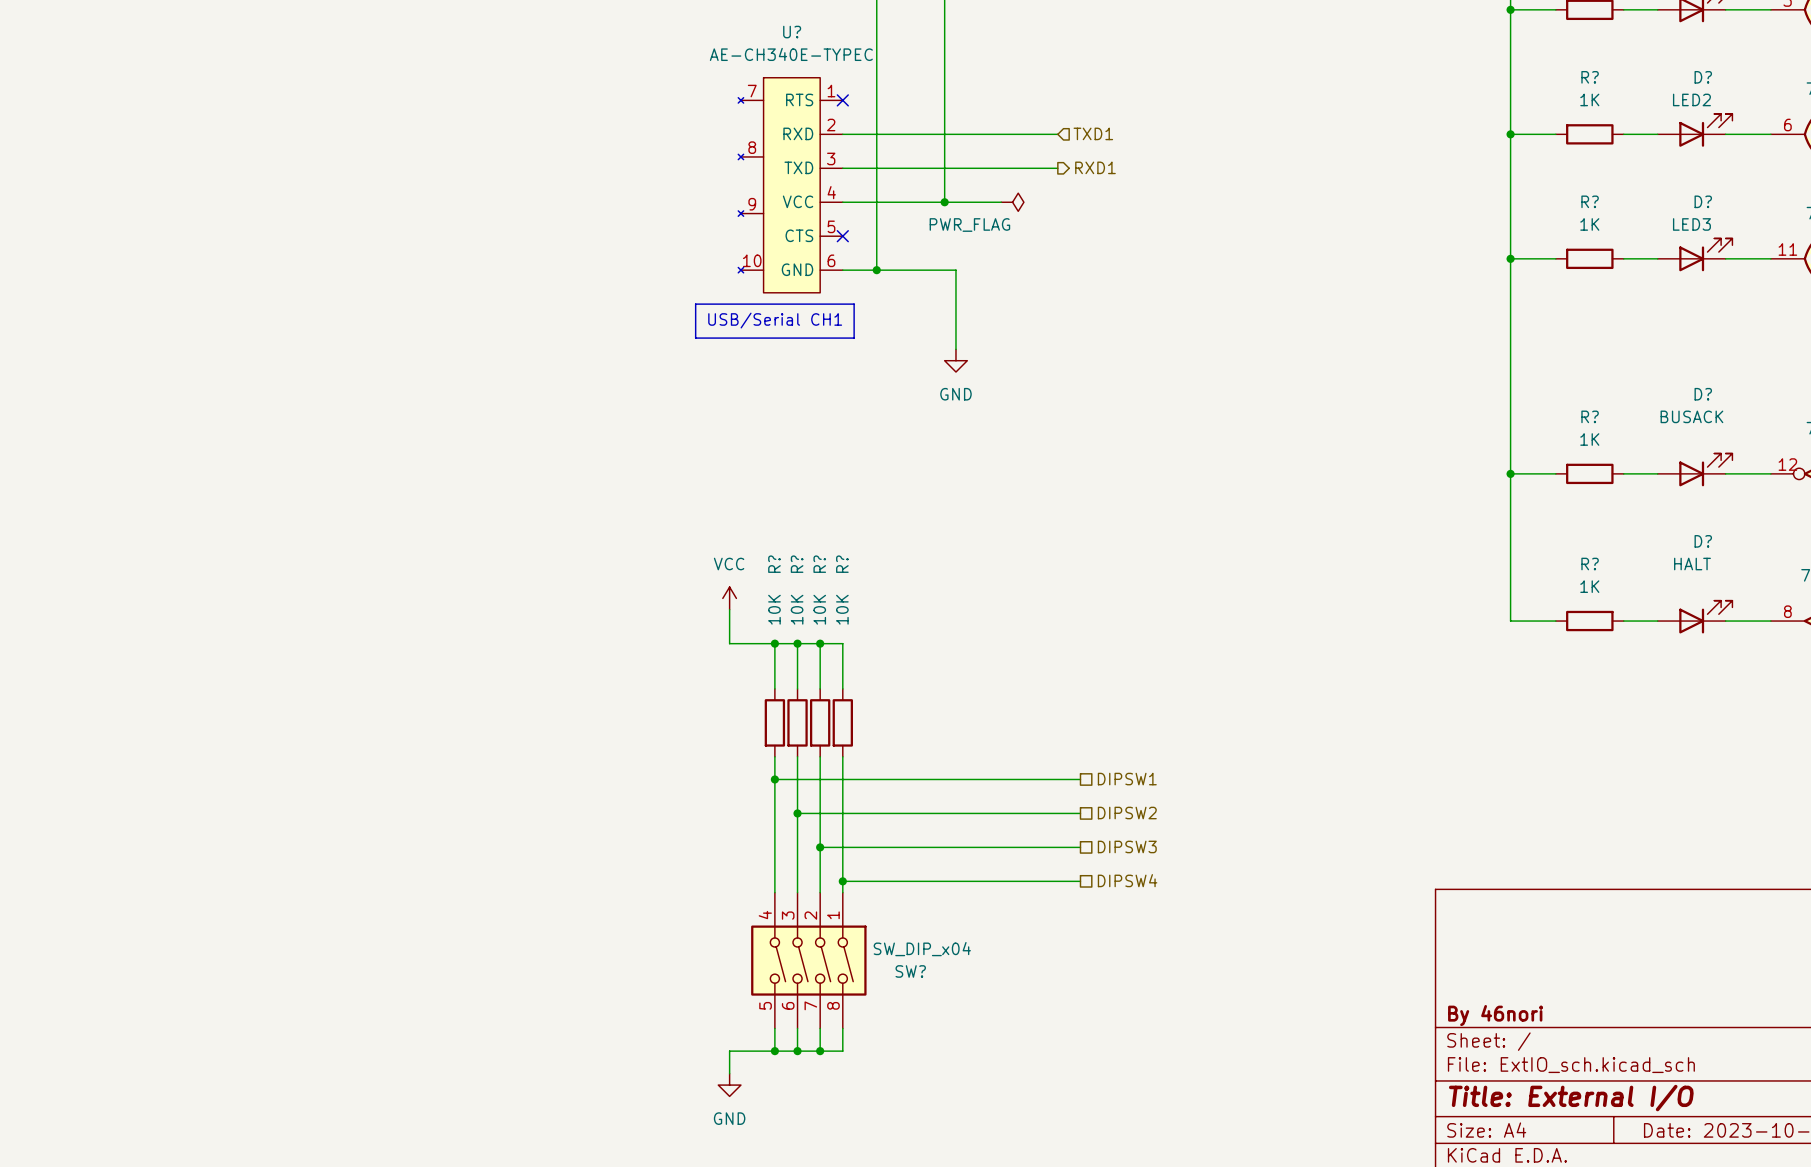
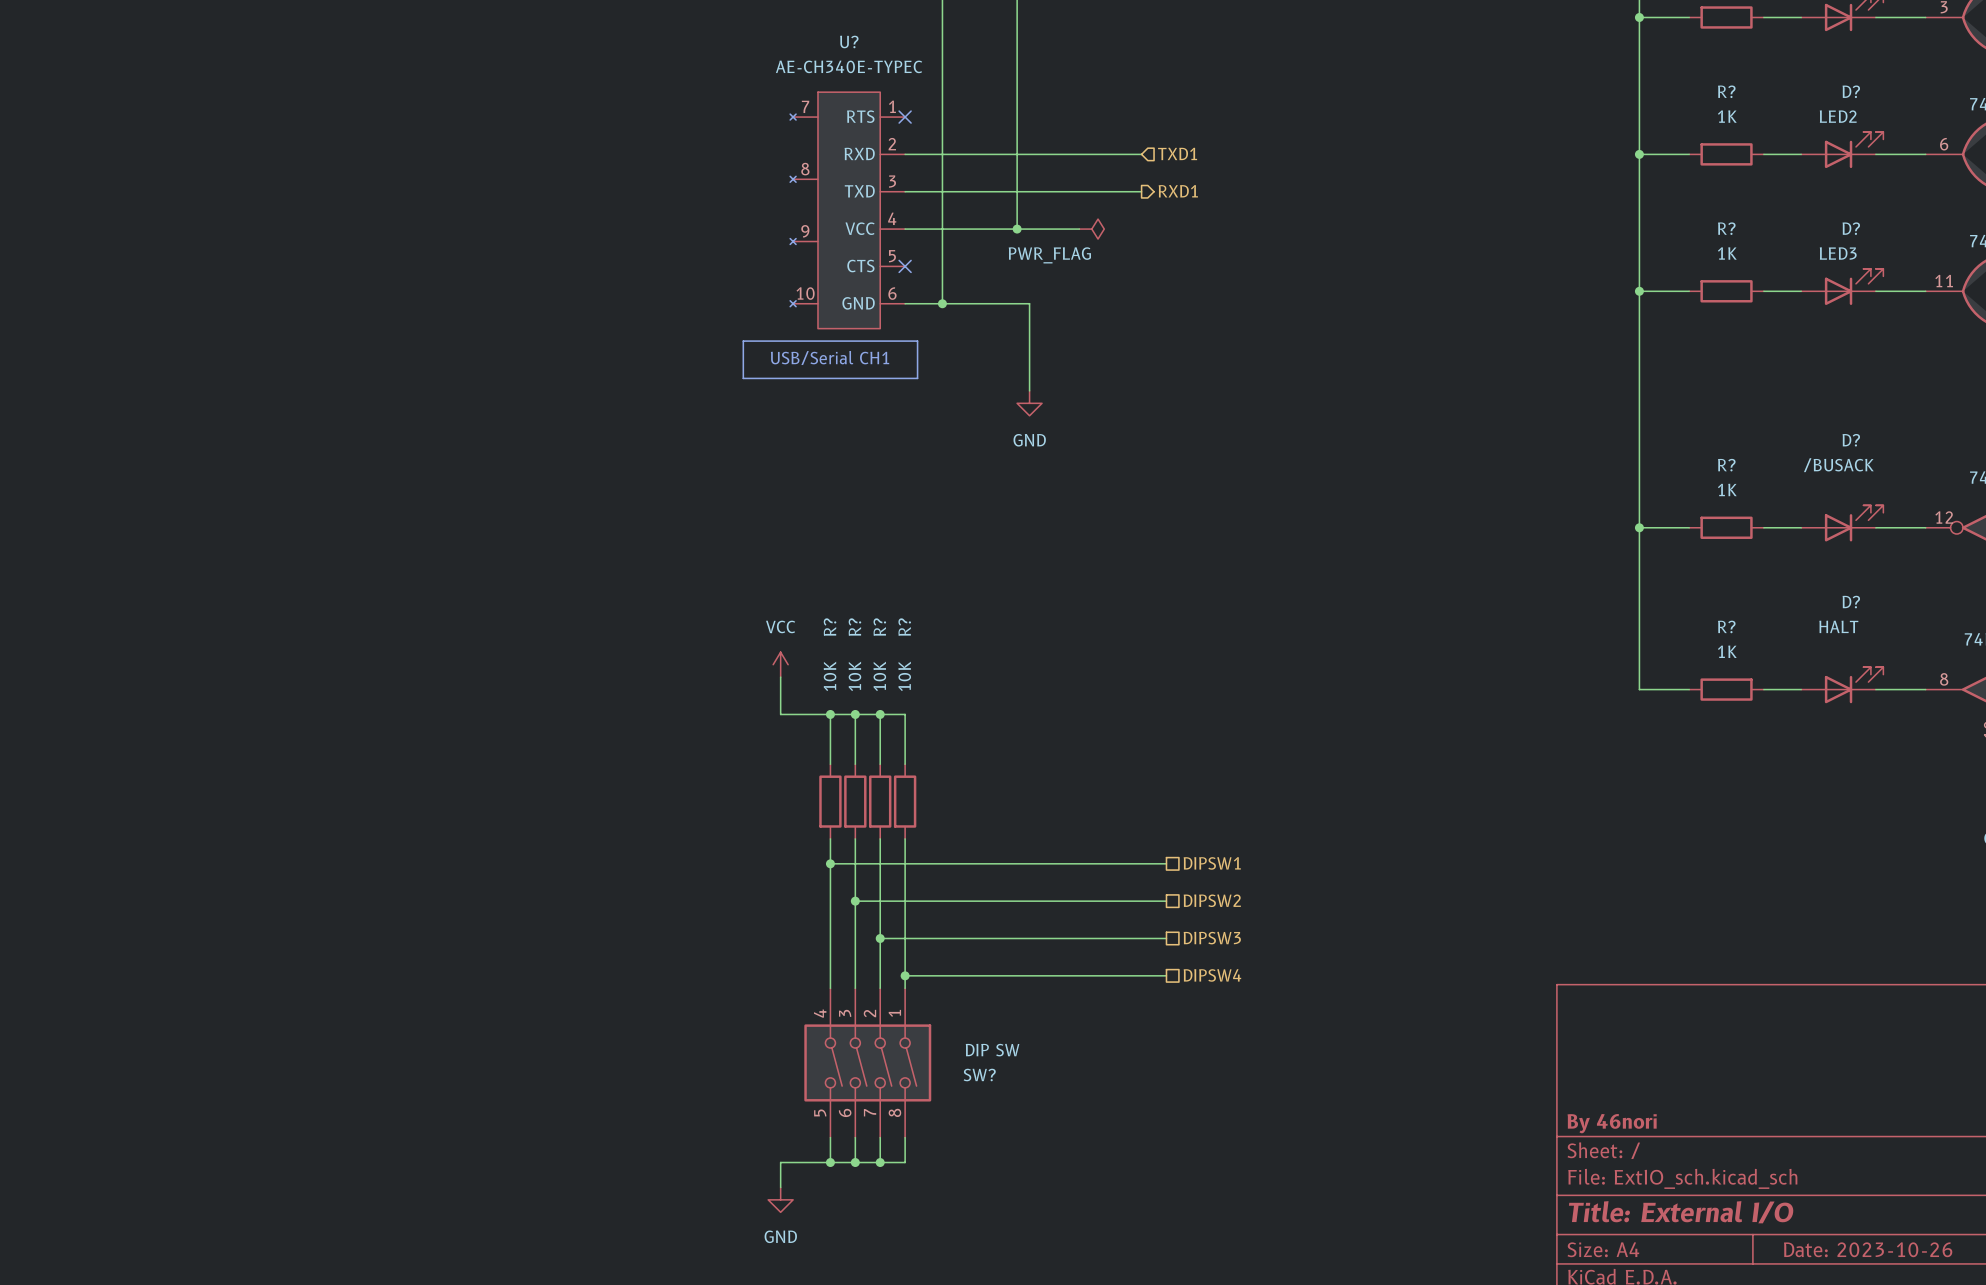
D? value: BUSACK (1691, 416) -> /BUSACK (1838, 465)
SW? value: SW_DIP_x04 (922, 949) -> DIP SW (992, 1050)

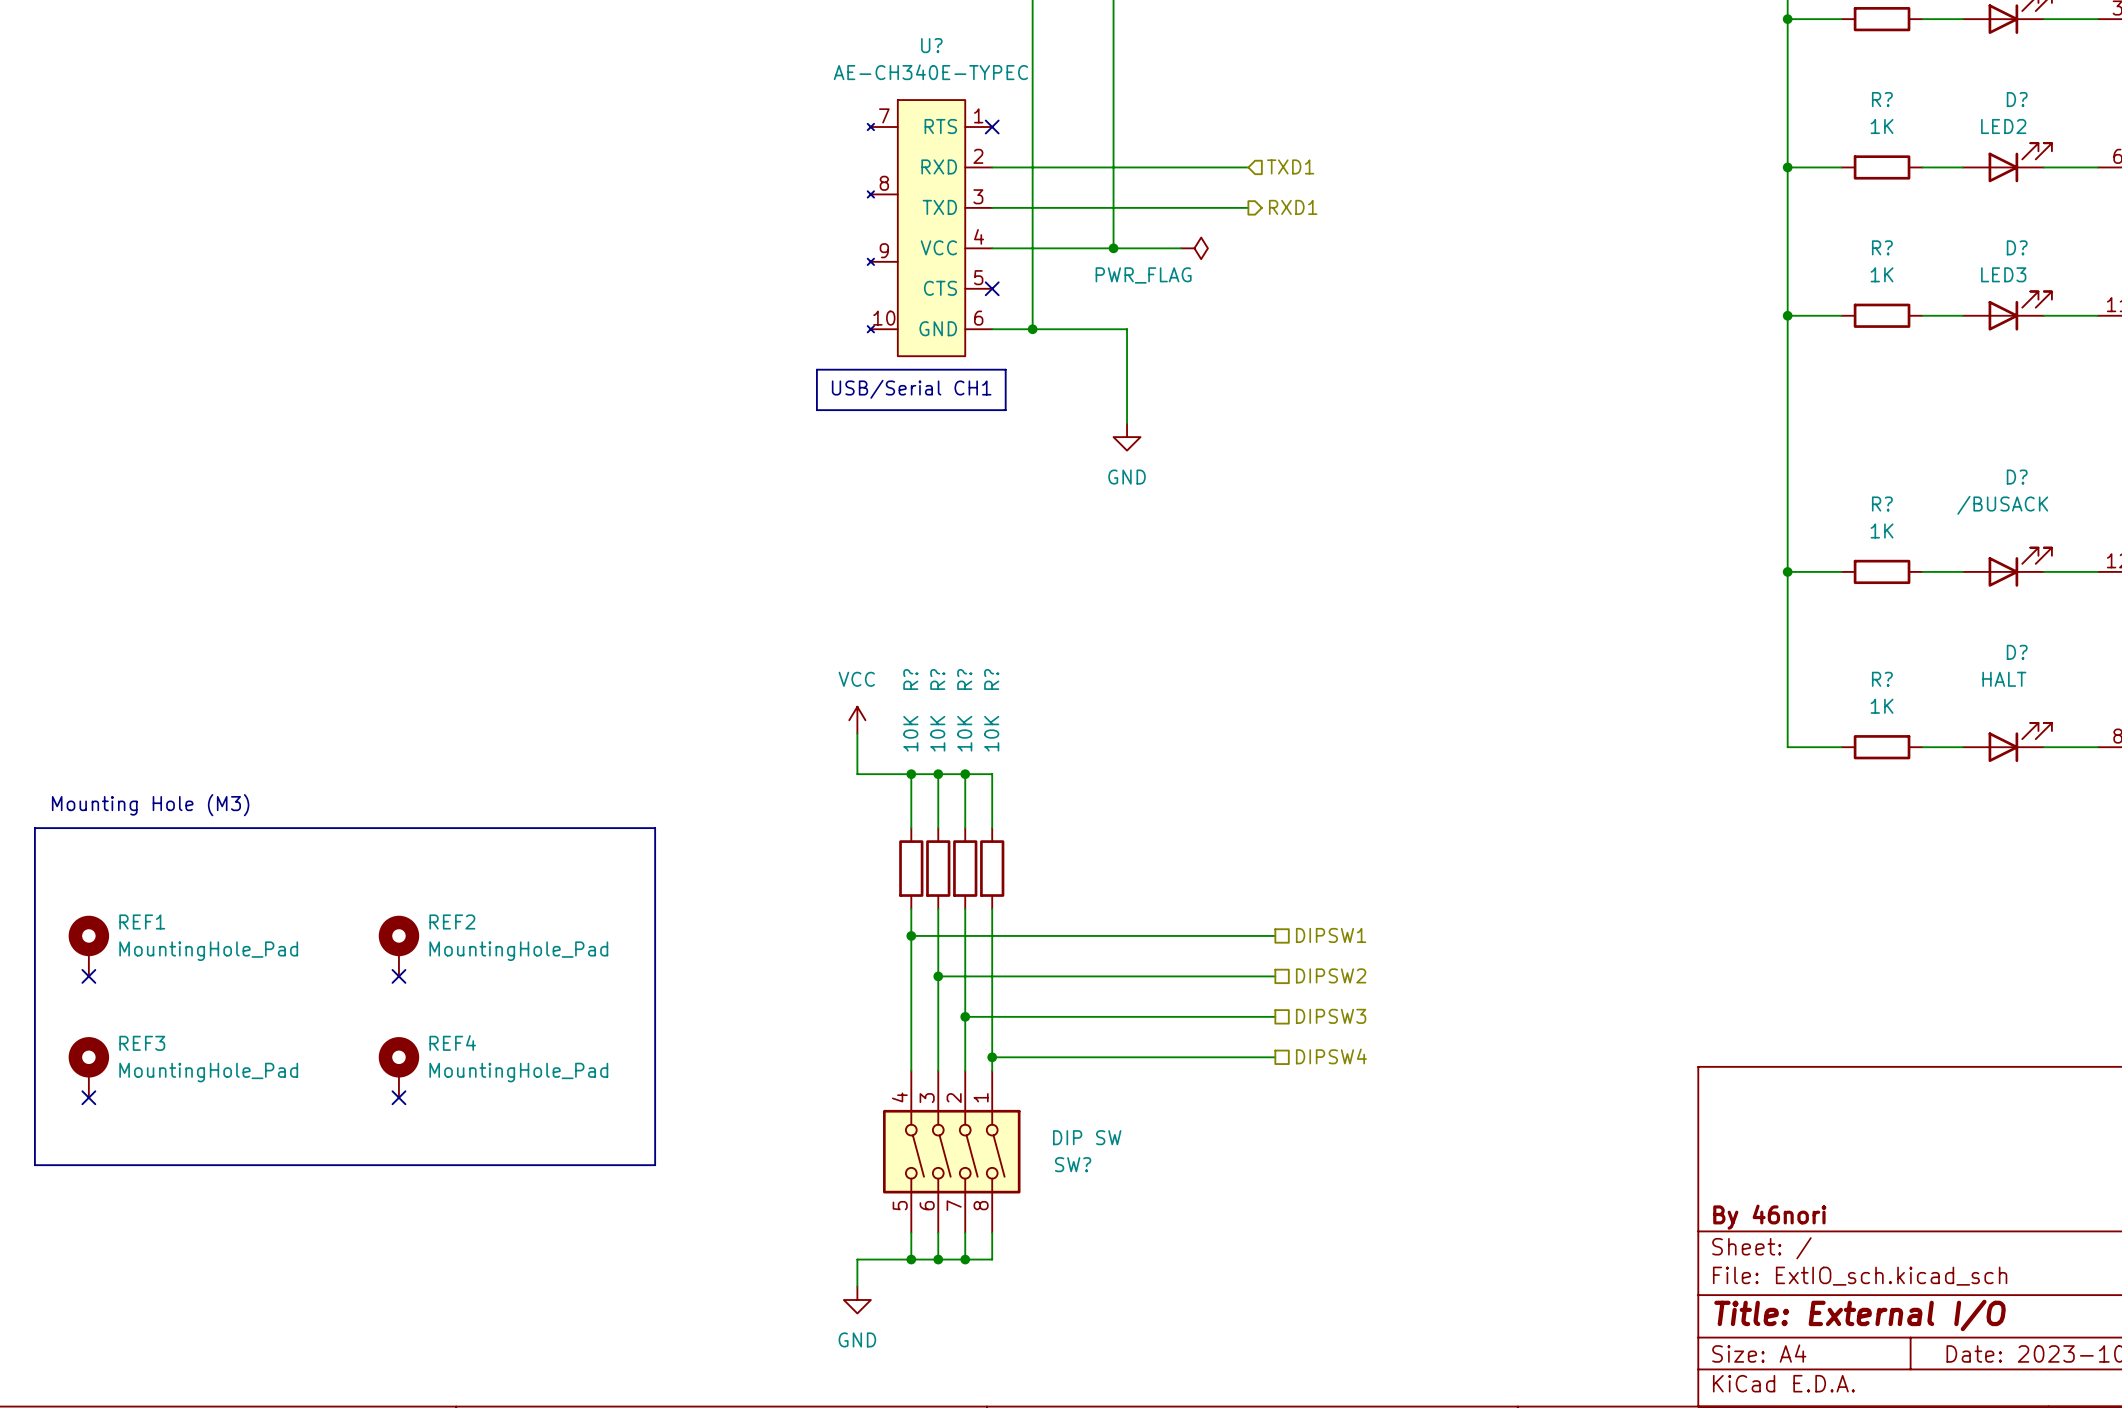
text: none -> Mounting Hole (M3) (150, 805)
line: none -> (34, 828) (34, 1165) (655, 1165) (655, 828) (34, 828)
REF1: none -> MountingHole_Pad (88, 946)
REF2: none -> MountingHole_Pad (398, 946)
no-connect mark: none -> (88, 976)
no-connect mark: none -> (398, 976)
REF3: none -> MountingHole_Pad (88, 1067)
REF4: none -> MountingHole_Pad (398, 1067)
no-connect mark: none -> (88, 1097)
no-connect mark: none -> (398, 1097)

